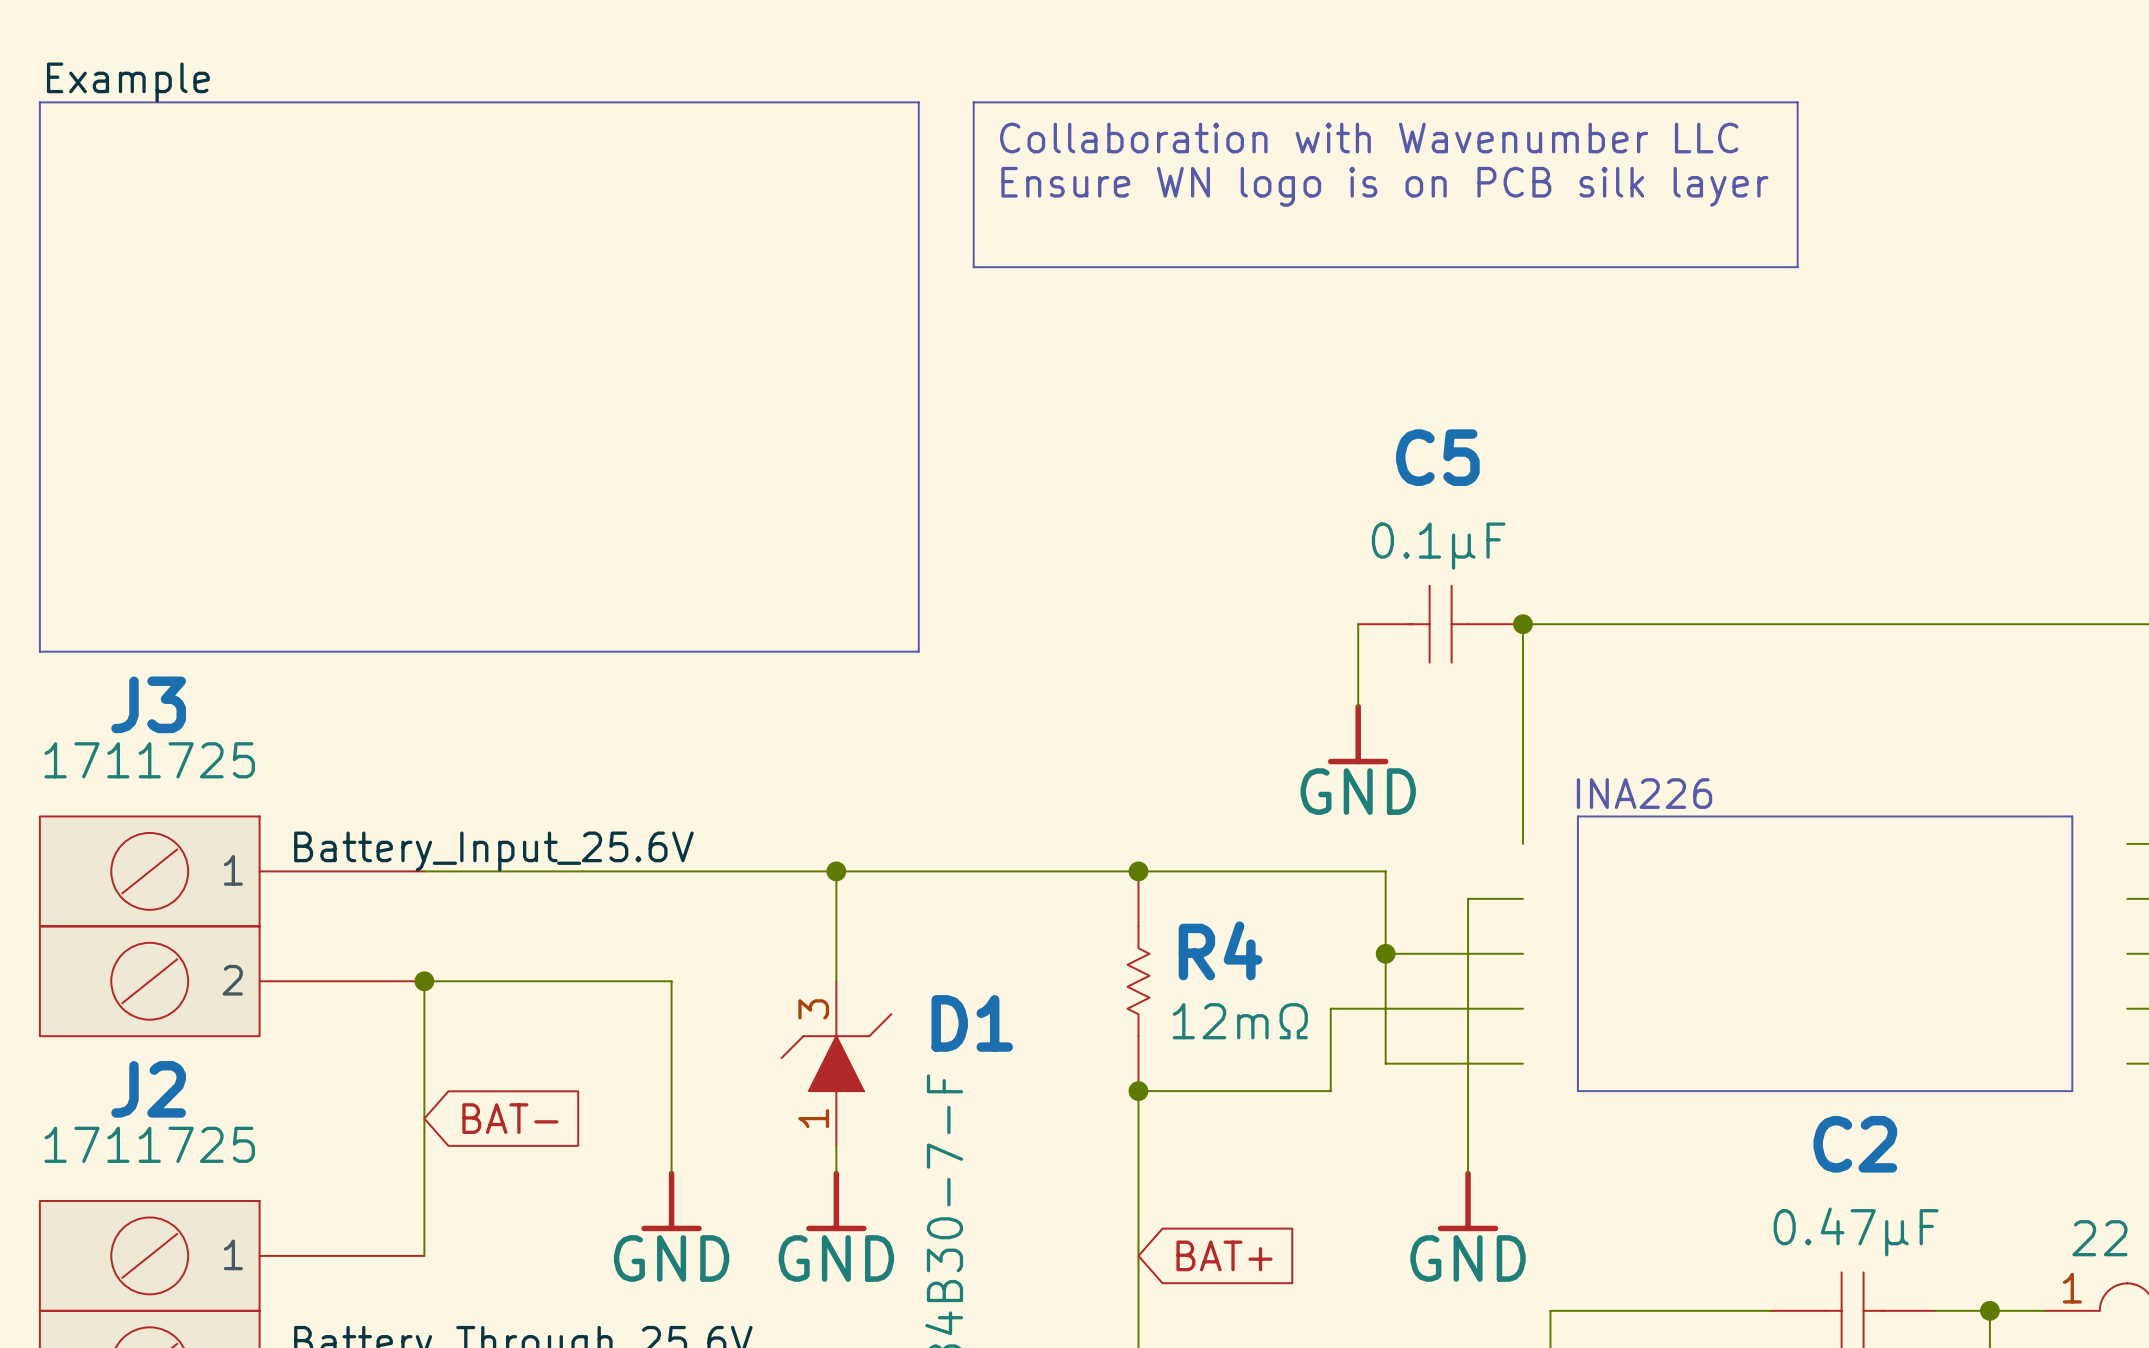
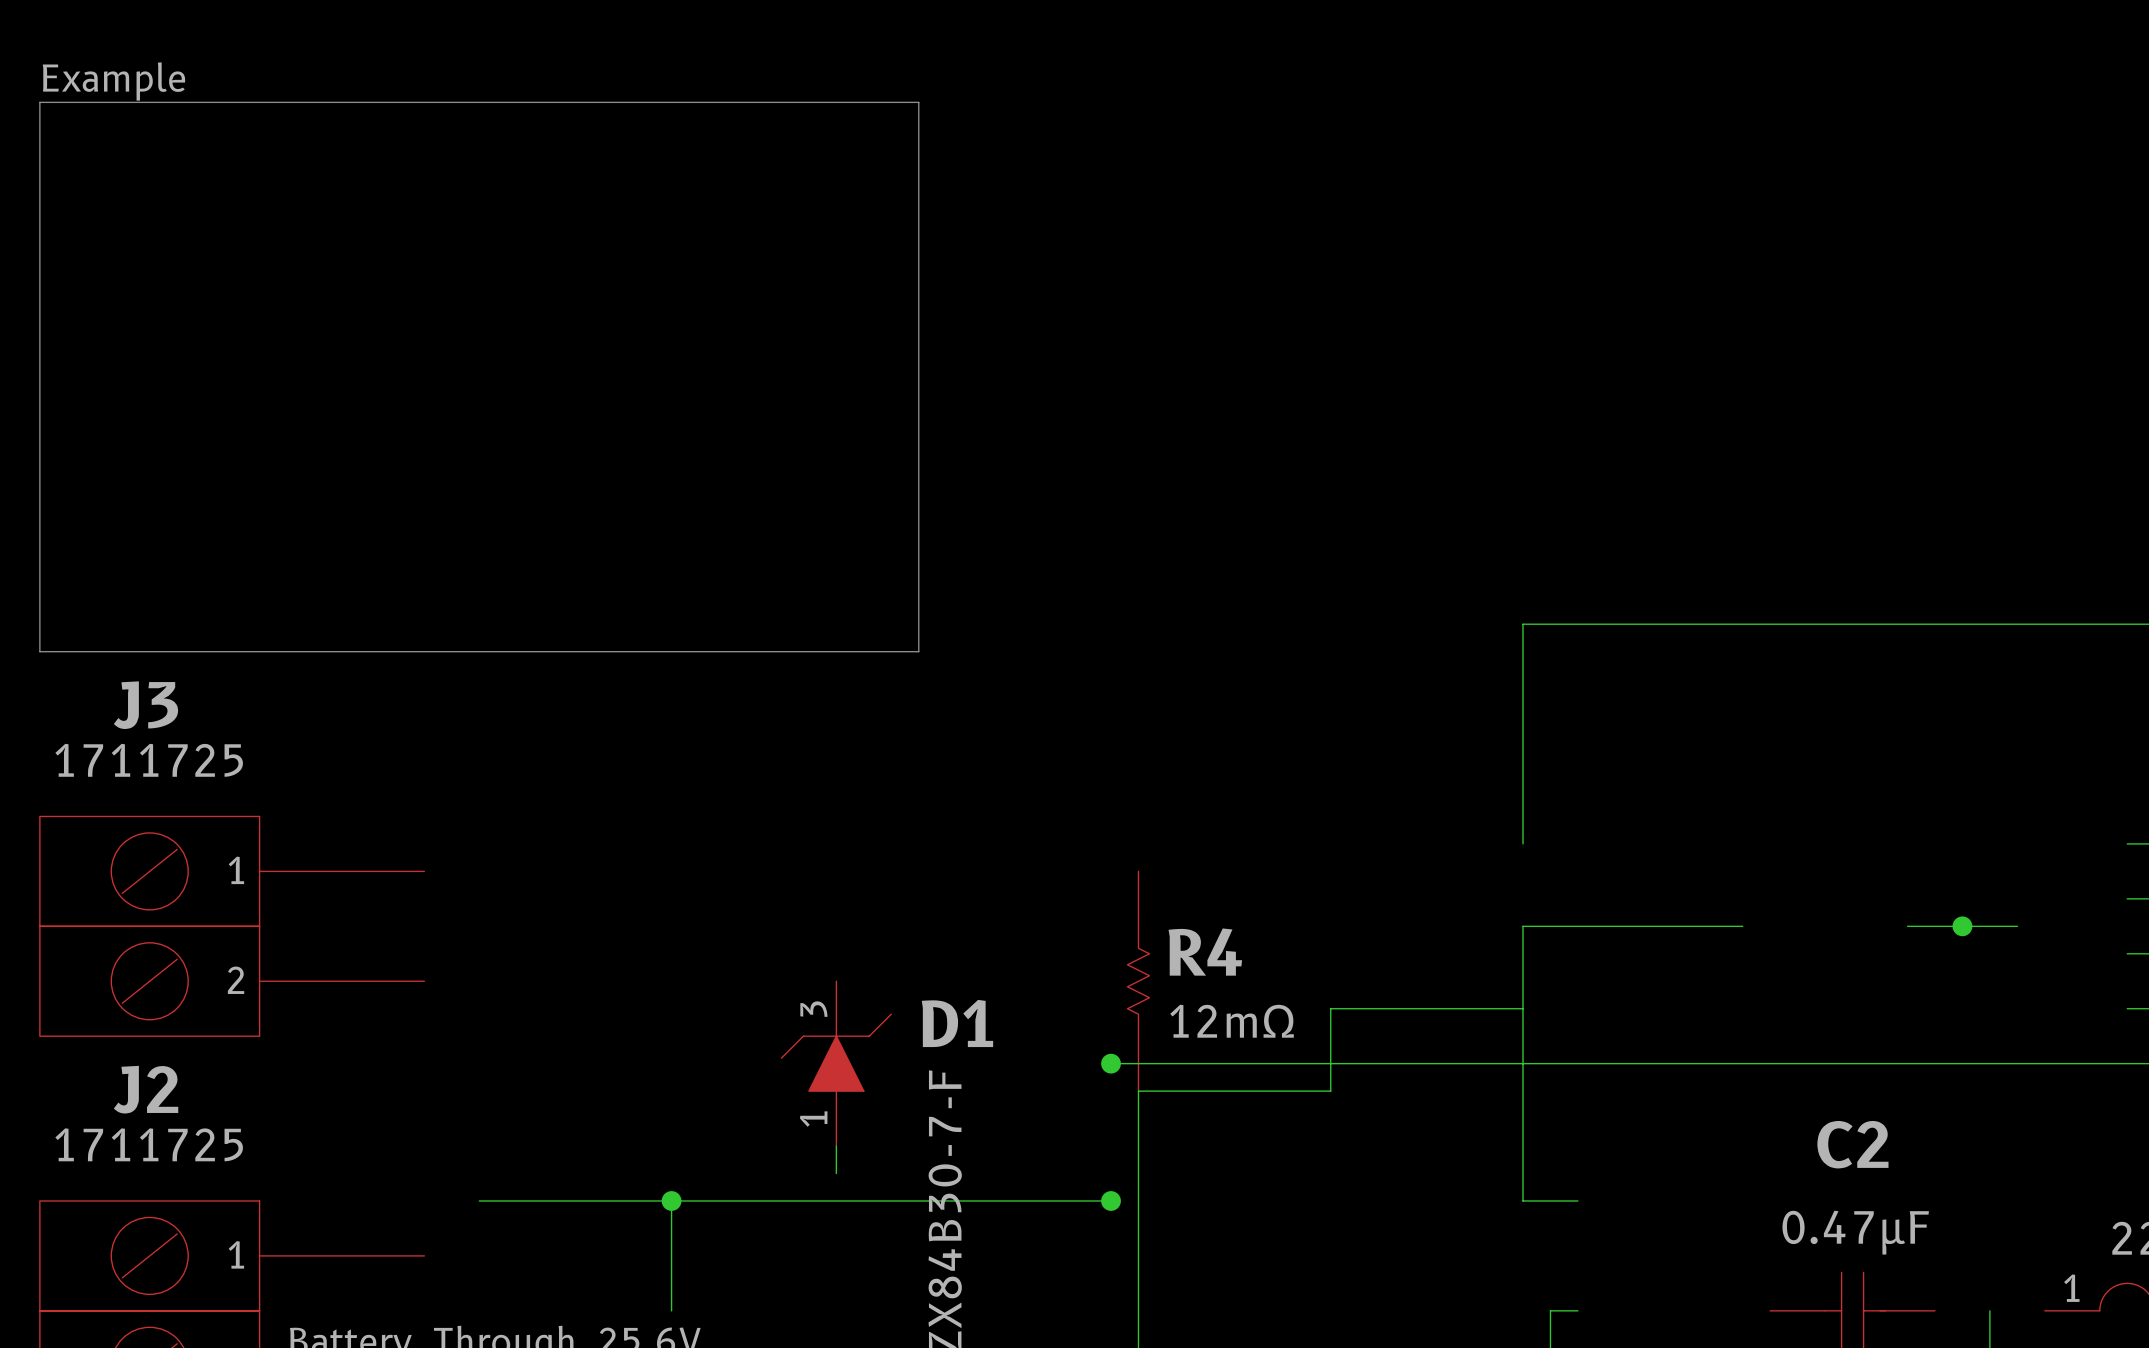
line: (973, 102) (1797, 102) (1797, 267) (973, 267) (973, 102) -> none
text: Collaboration with Wavenumber LLC (1369, 138) -> none
text: Ensure WN logo is on PCB silk layer (1384, 186) -> none
wire: (1358, 624) (1358, 706) -> none
C5: 0.1µF (1440, 624) -> none
junction: (1523, 624) -> none
power symbol: GND (1358, 734) -> none
text: INA226 (1644, 793) -> none
line: (1577, 816) (2072, 816) (2072, 1091) (1577, 1091) (1577, 816) -> none
label: Battery_Input_25.6V (493, 851) -> none
wire: (424, 871) (1385, 871) (1385, 1063) -> (1111, 1063) (1385, 1063)
wire: (836, 871) (836, 981) -> (671, 1200) (671, 1310)
junction: (836, 871) -> none
junction: (1138, 871) -> none
wire: (1523, 898) (1468, 898) (1468, 1173) -> none
wire: none -> (1742, 926) (1523, 926) (1523, 1200) (1577, 1200)
junction: none -> (1962, 926)
wire: (1385, 953) (1523, 953) -> none
junction: (1385, 953) -> none
junction: (424, 981) -> none
wire: none -> (1523, 1063) (2127, 1063)
junction position: (1138, 1091) -> (1111, 1063)
global label: BAT- (510, 1118) -> none
wire: (671, 1173) (671, 981) (424, 981) (424, 1255) -> none
wire: none -> (479, 1200) (1111, 1200)
junction: none -> (671, 1200)
power symbol: GND (671, 1200) -> none
power symbol: GND (836, 1200) -> none
junction: none -> (1111, 1200)
power symbol: GND (1468, 1200) -> none
global label: BAT+ (1224, 1255) -> none
wire: (1577, 1310) (1770, 1310) -> none
wire: (1934, 1310) (2044, 1310) -> (1907, 926) (2017, 926)
junction: (1989, 1310) -> none

